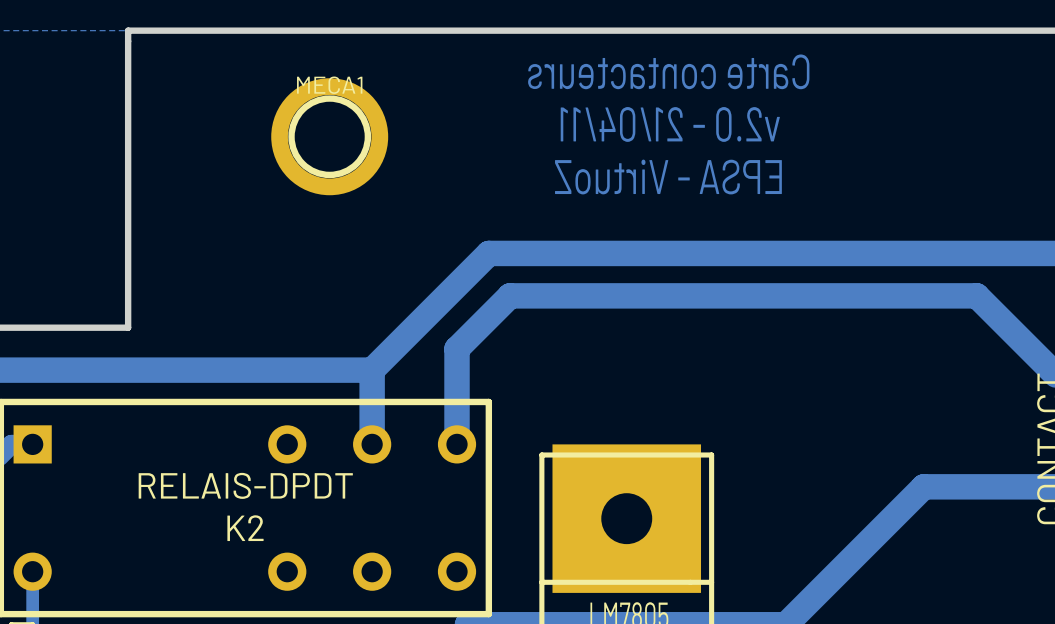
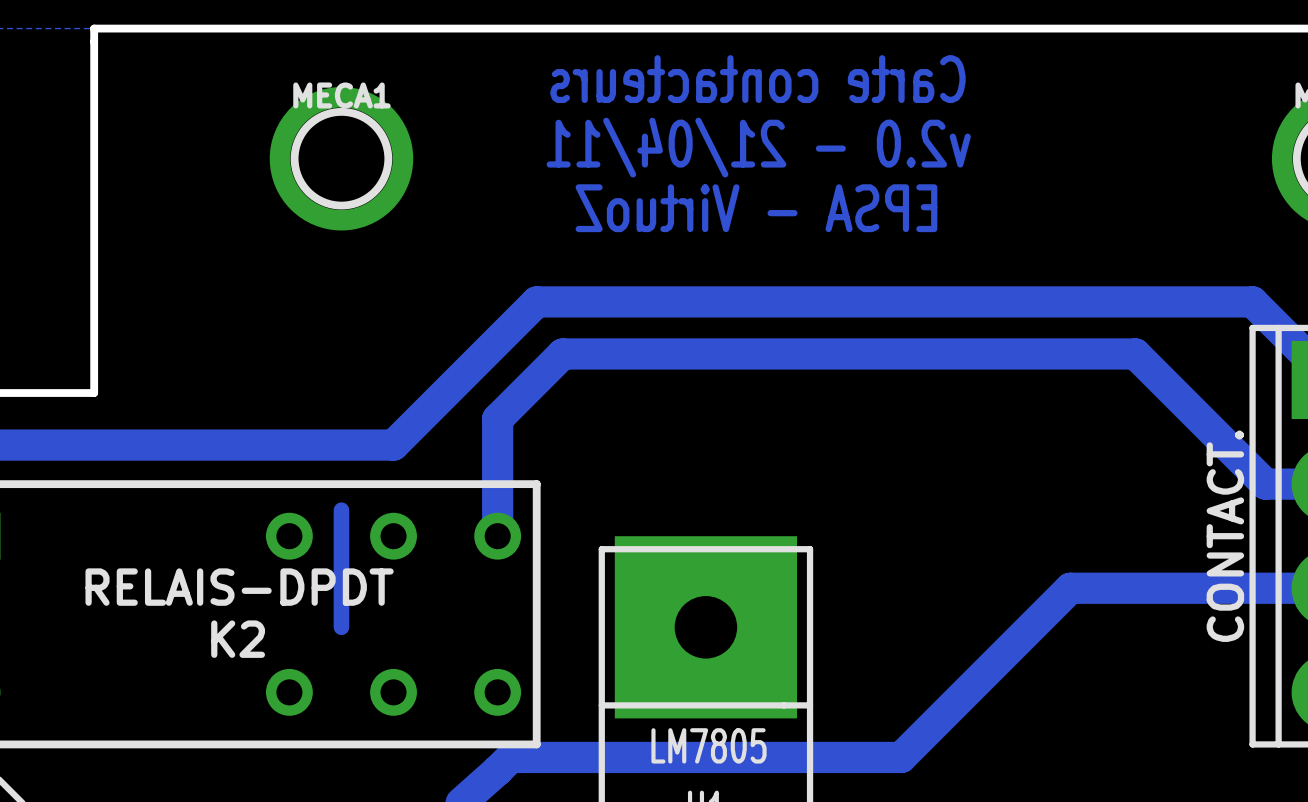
bottom track: (372, 370) (372, 444) -> none
bottom track: none -> (341, 510) (341, 627)

